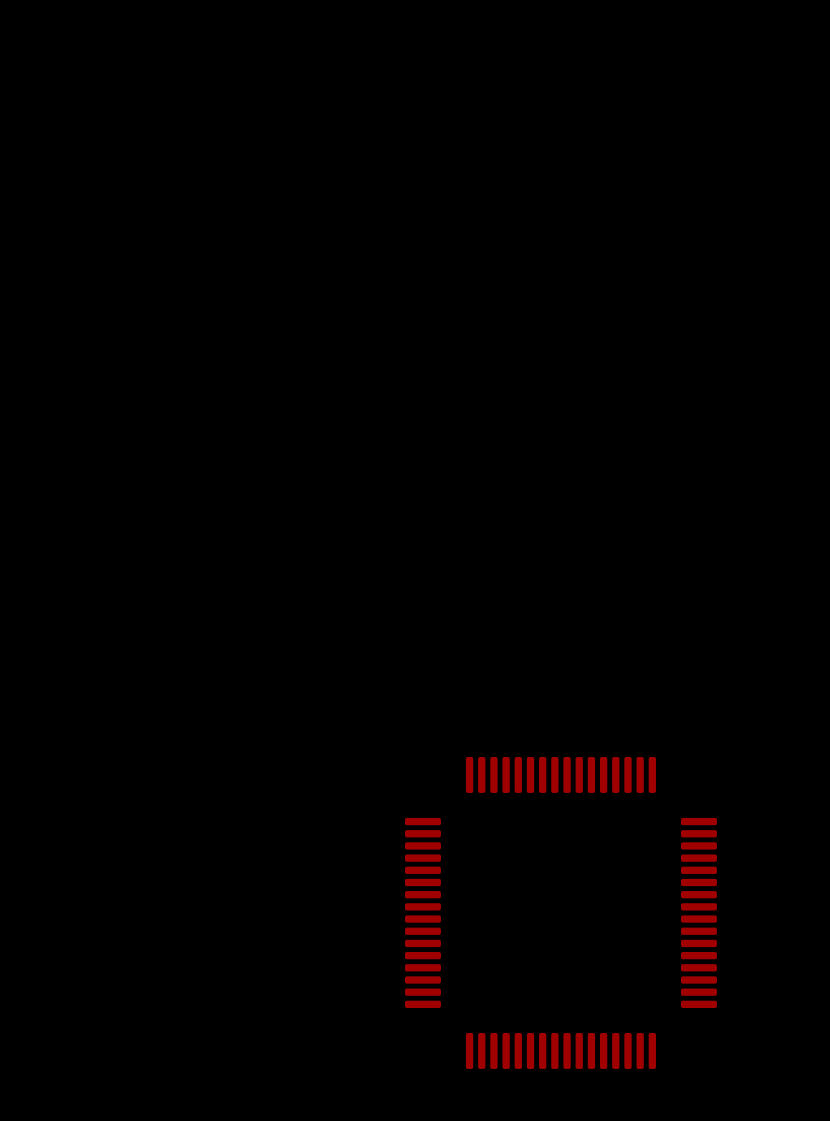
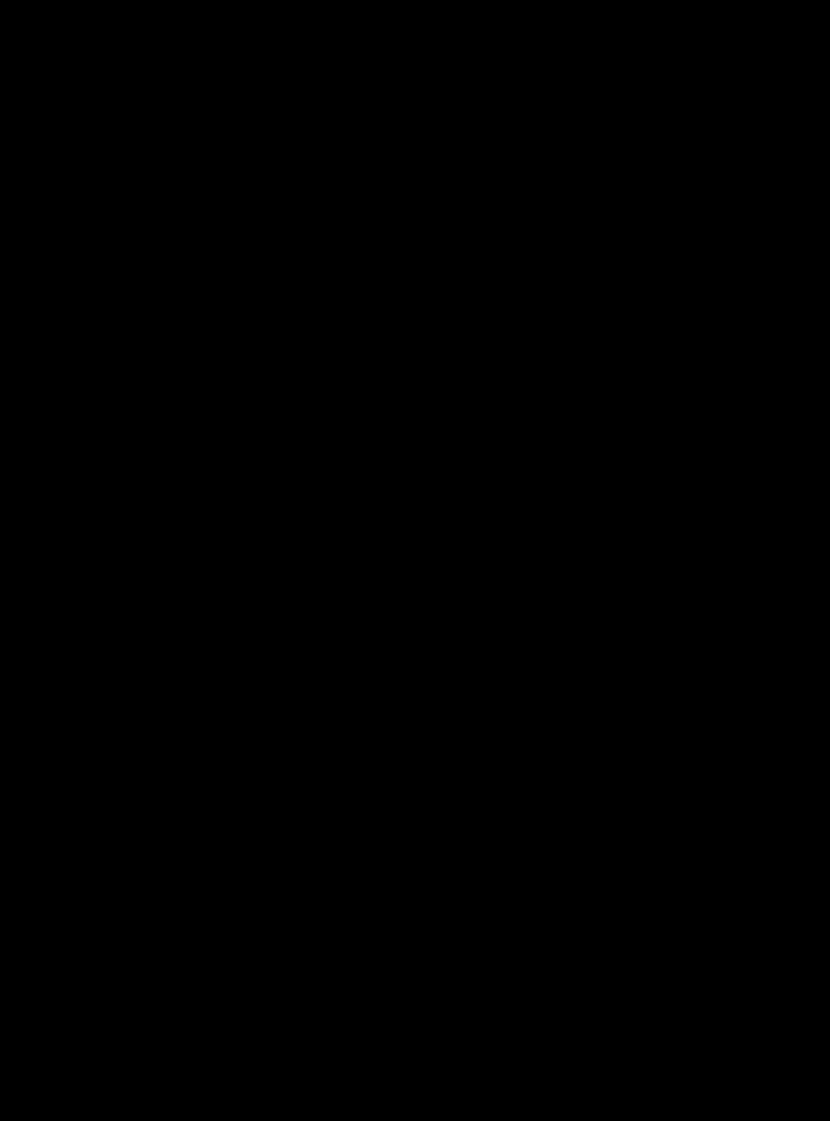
part: (560, 912) -> none

